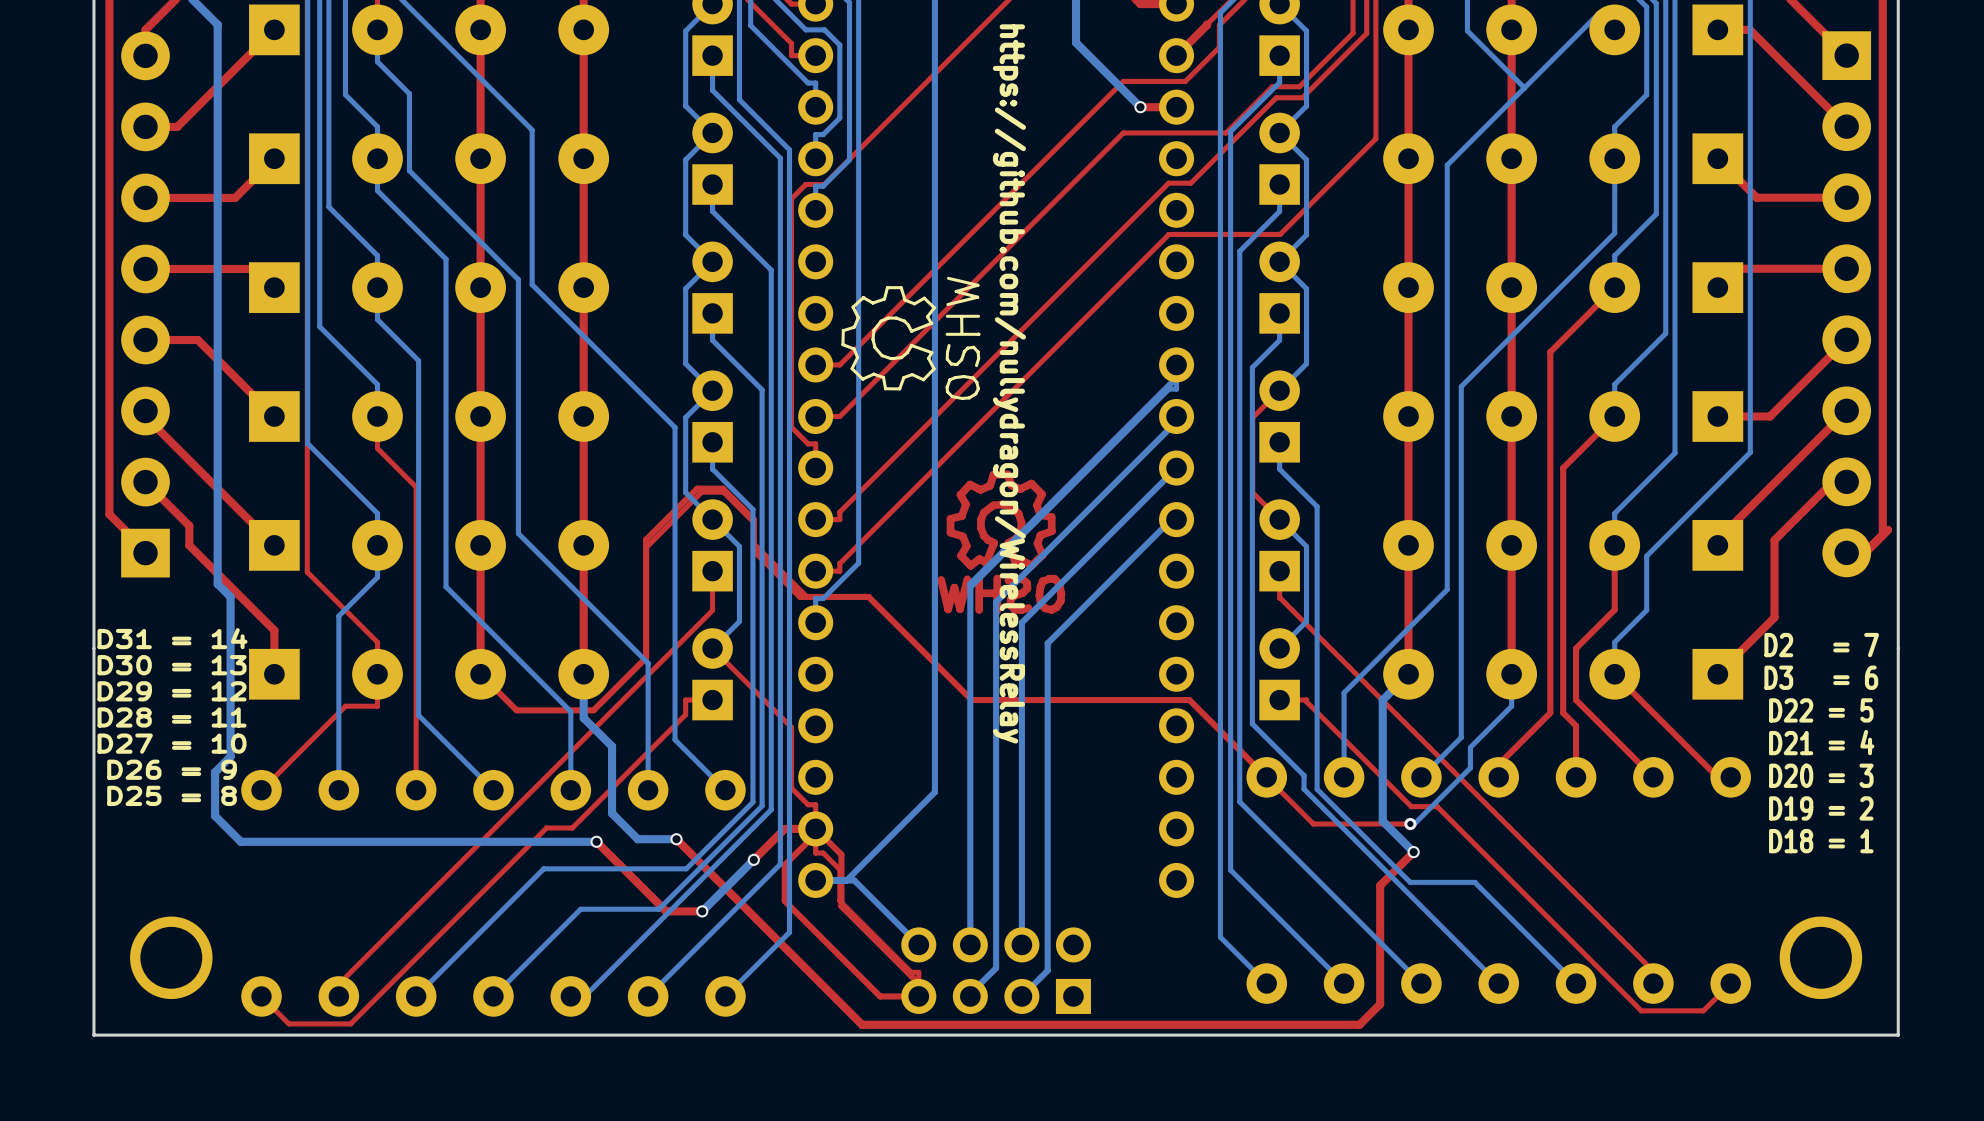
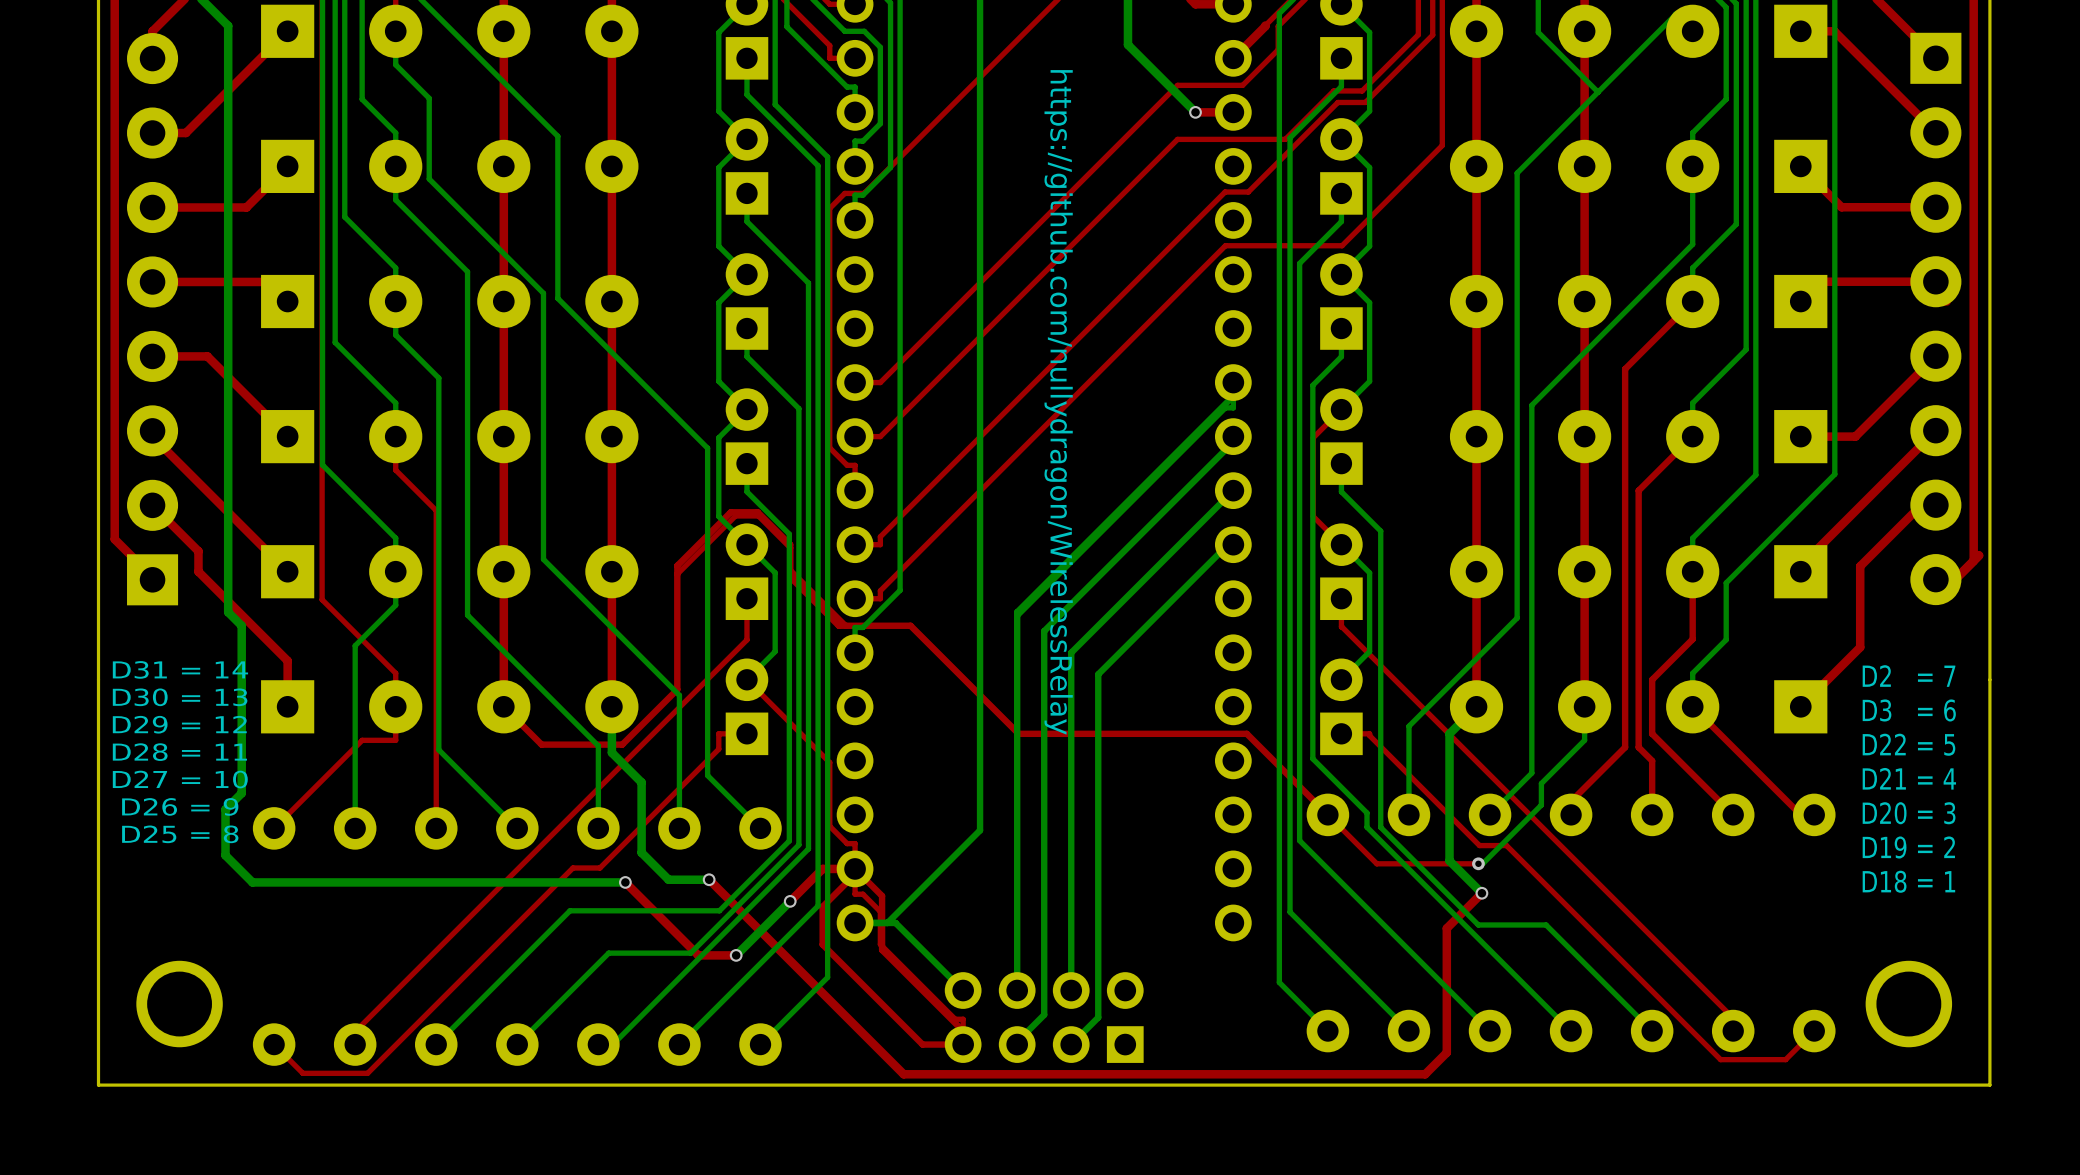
drawing: [841, 276, 981, 400] -> none
drawing: [937, 470, 1066, 615] -> none

